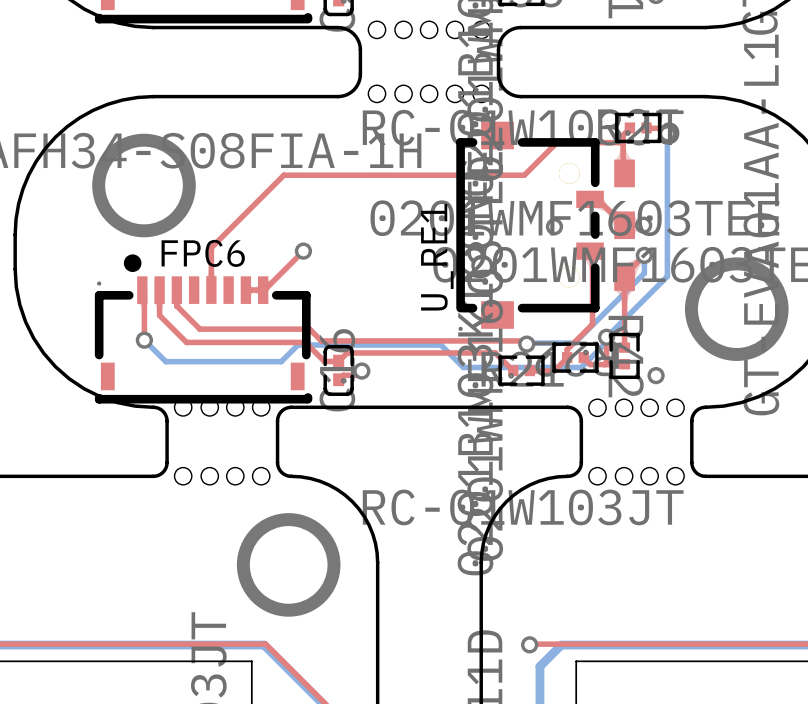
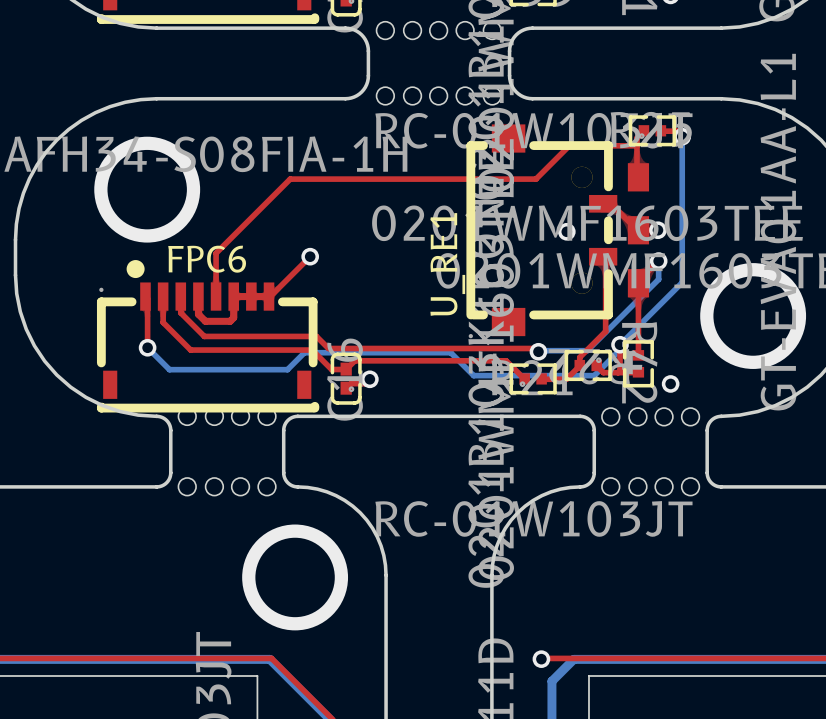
top track: none -> (198, 296) (198, 314) (205, 321) (230, 321) (233, 317) (233, 296) (269, 296)

